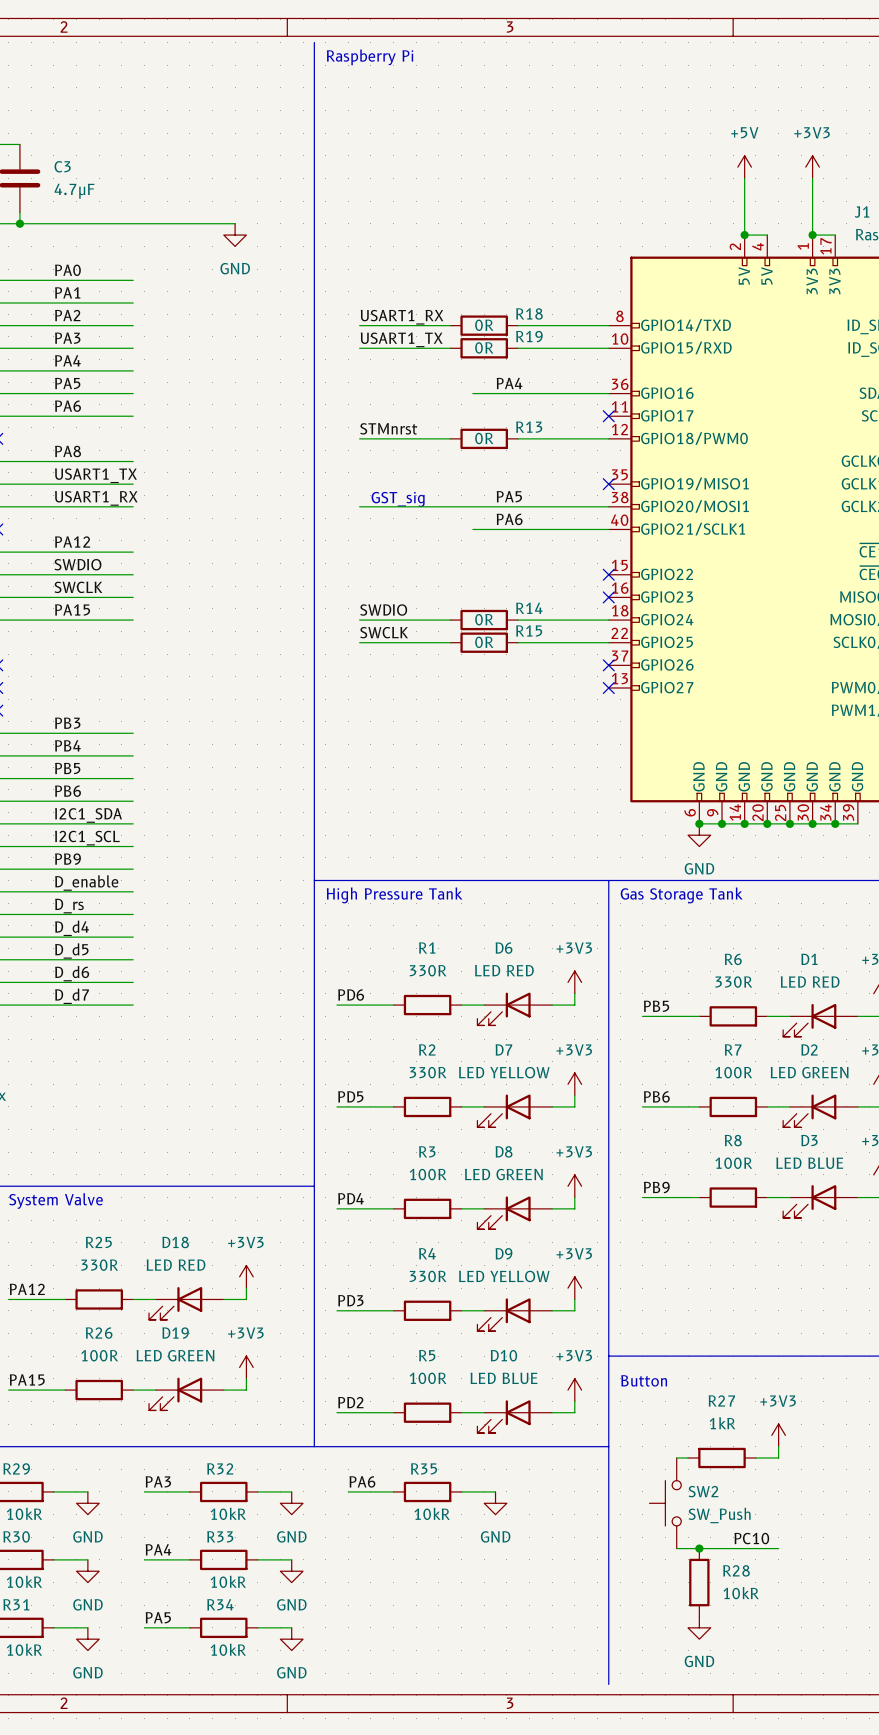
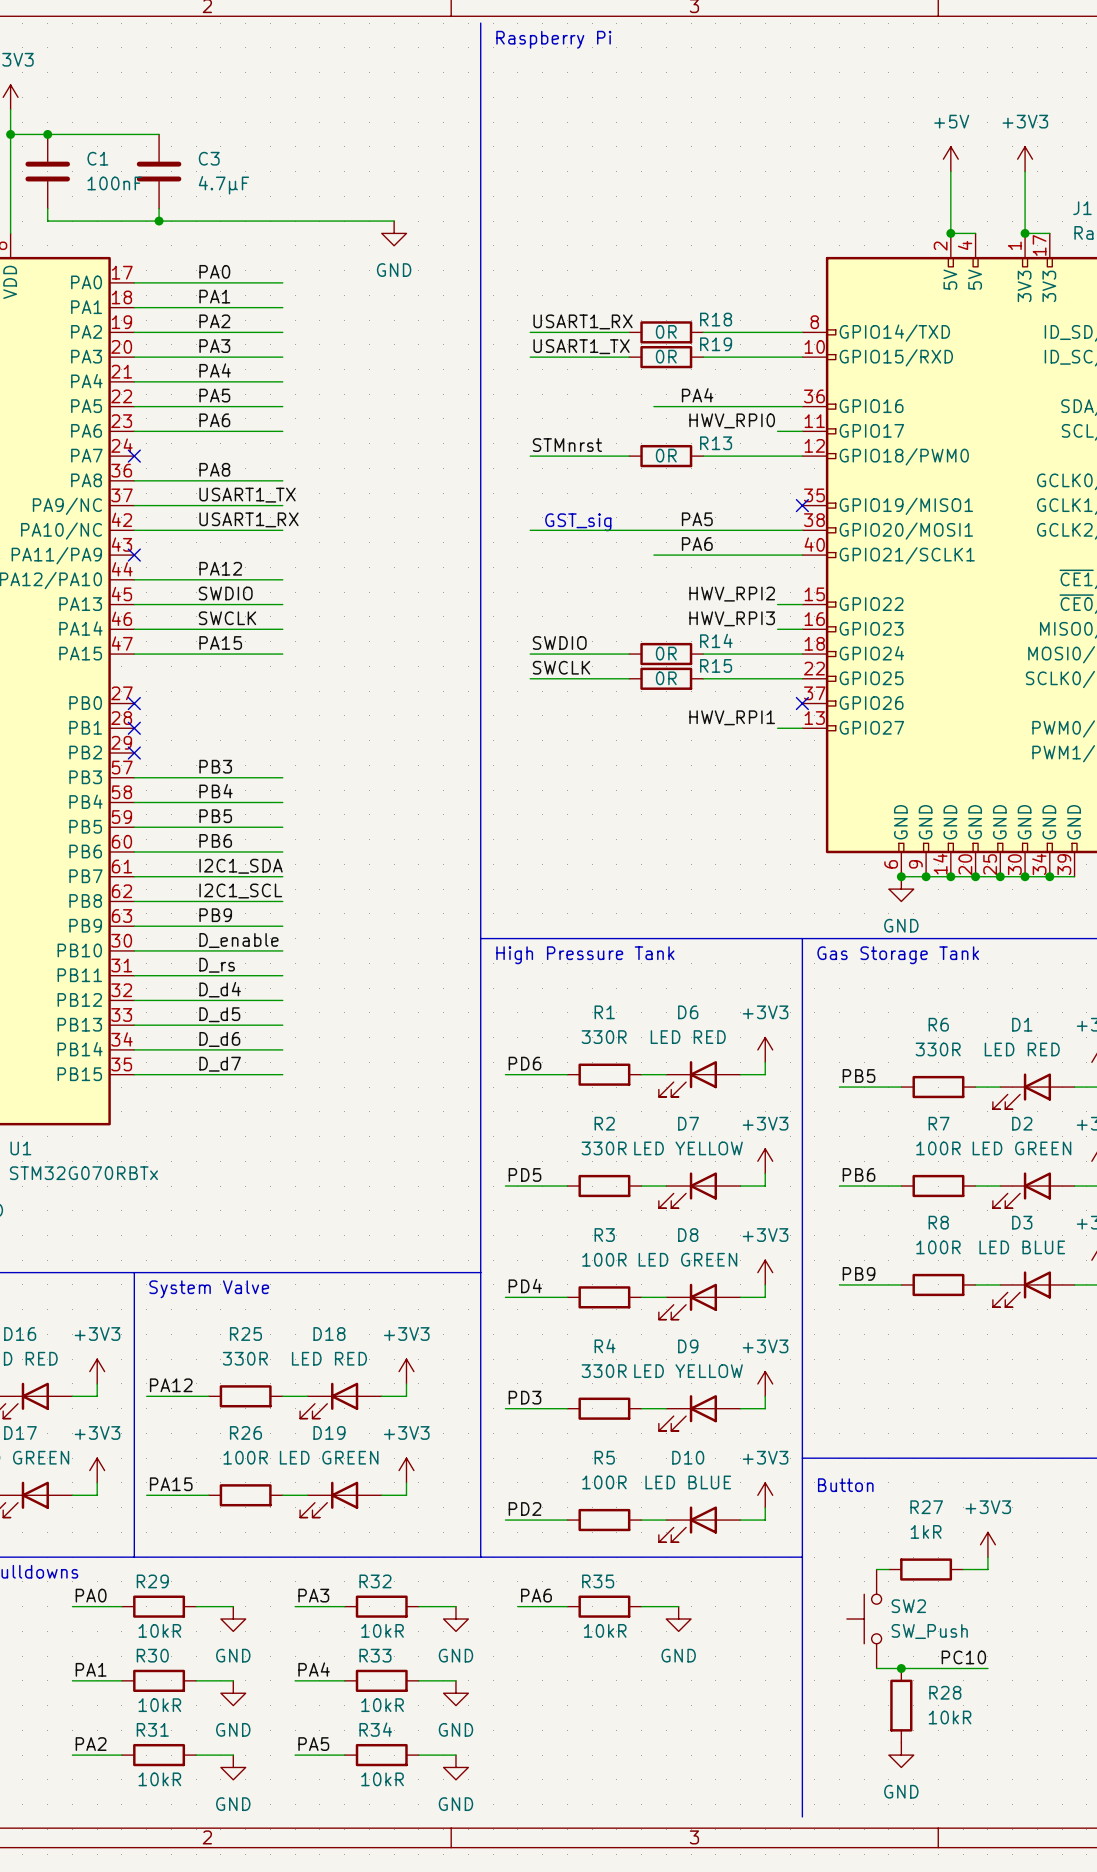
label: none -> HWV_RPI0 (732, 420)
wire: none -> (777, 431) (802, 431)
no-connect mark: (608, 416) -> none
label: none -> HWV_RPI2 (732, 594)
wire: none -> (777, 604) (802, 604)
no-connect mark: (608, 574) -> none
label: none -> HWV_RPI3 (732, 618)
wire: none -> (777, 629) (802, 629)
no-connect mark: (608, 597) -> none
label: none -> HWV_RPI1 (732, 717)
wire: none -> (777, 728) (802, 728)
no-connect mark: (608, 687) -> none

